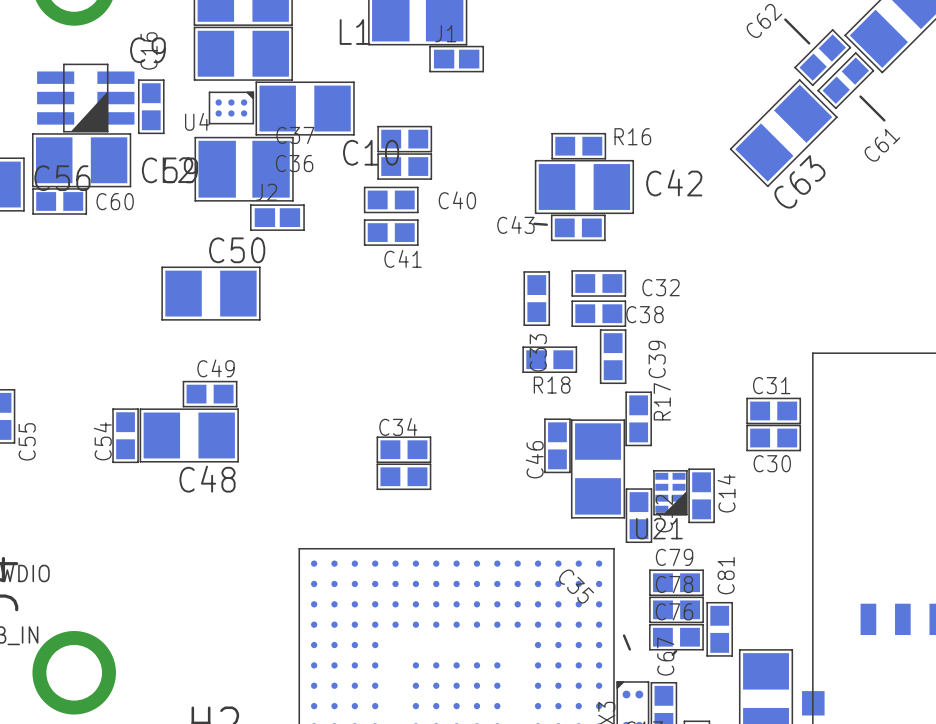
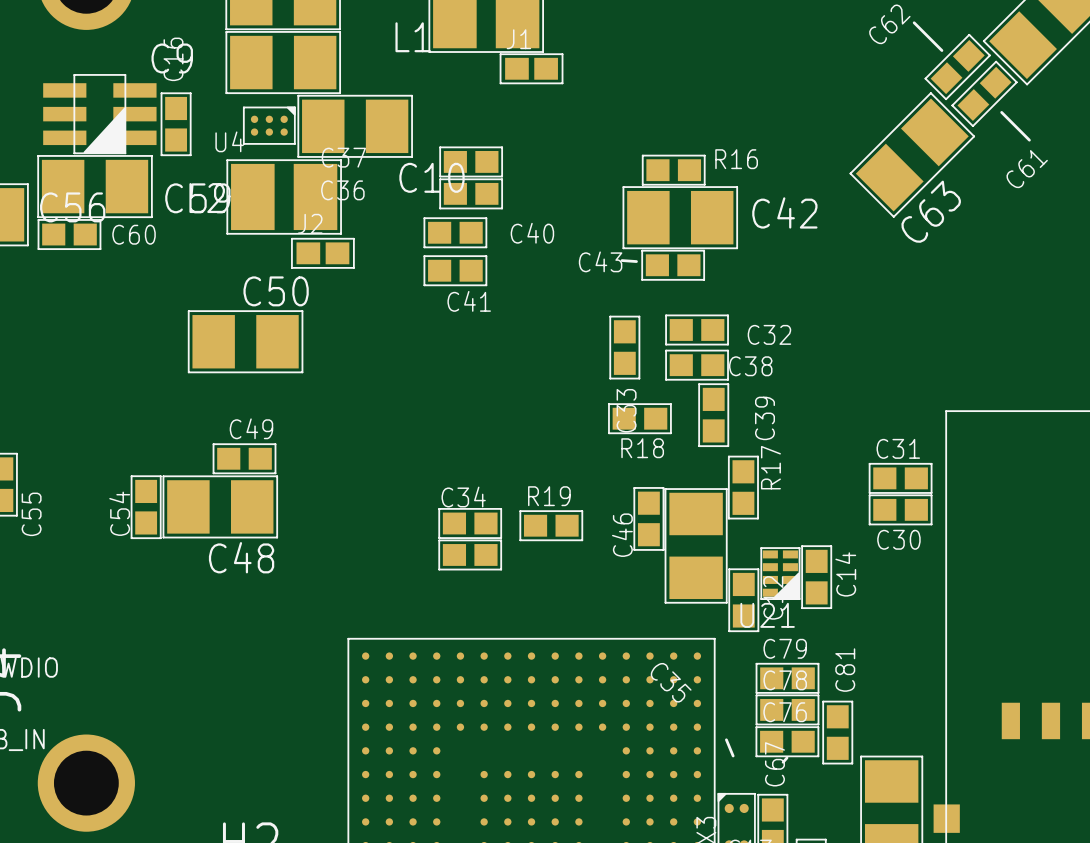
R19: none -> (551, 525)

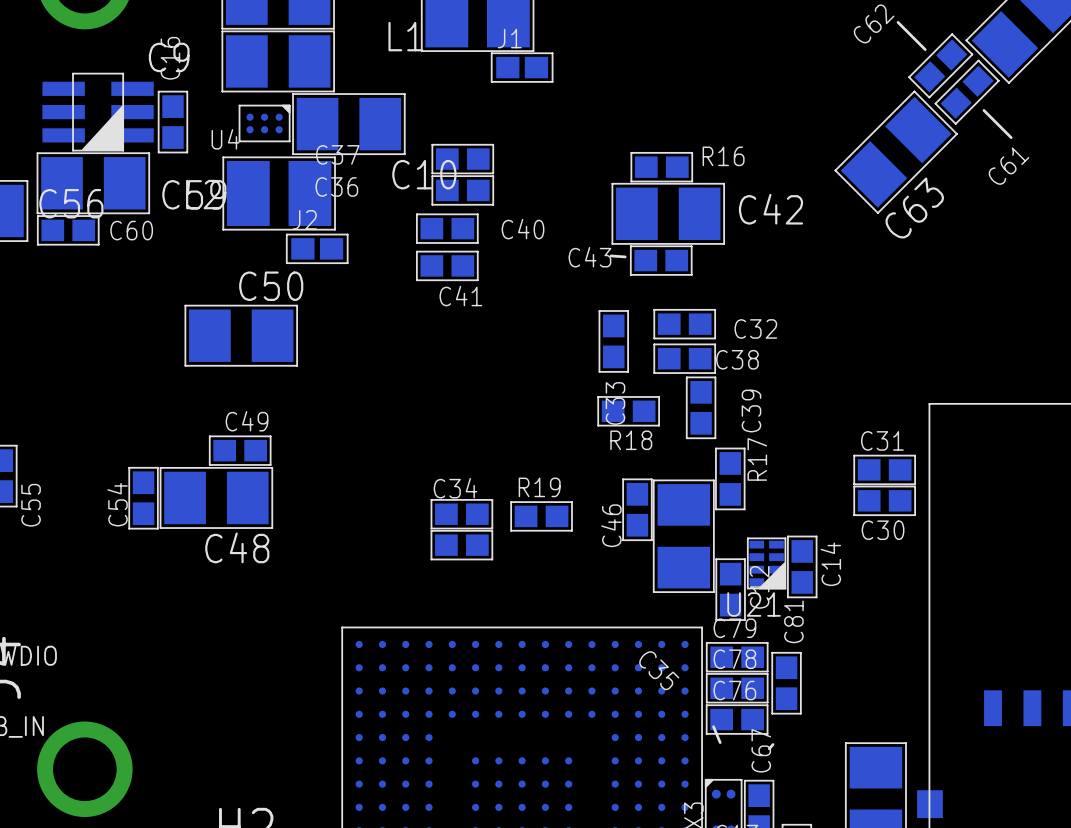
C79 position: (787, 678) -> (737, 657)
C78 position: (787, 709) -> (737, 688)
C81 position: (837, 732) -> (786, 683)
C76 position: (787, 741) -> (737, 719)

